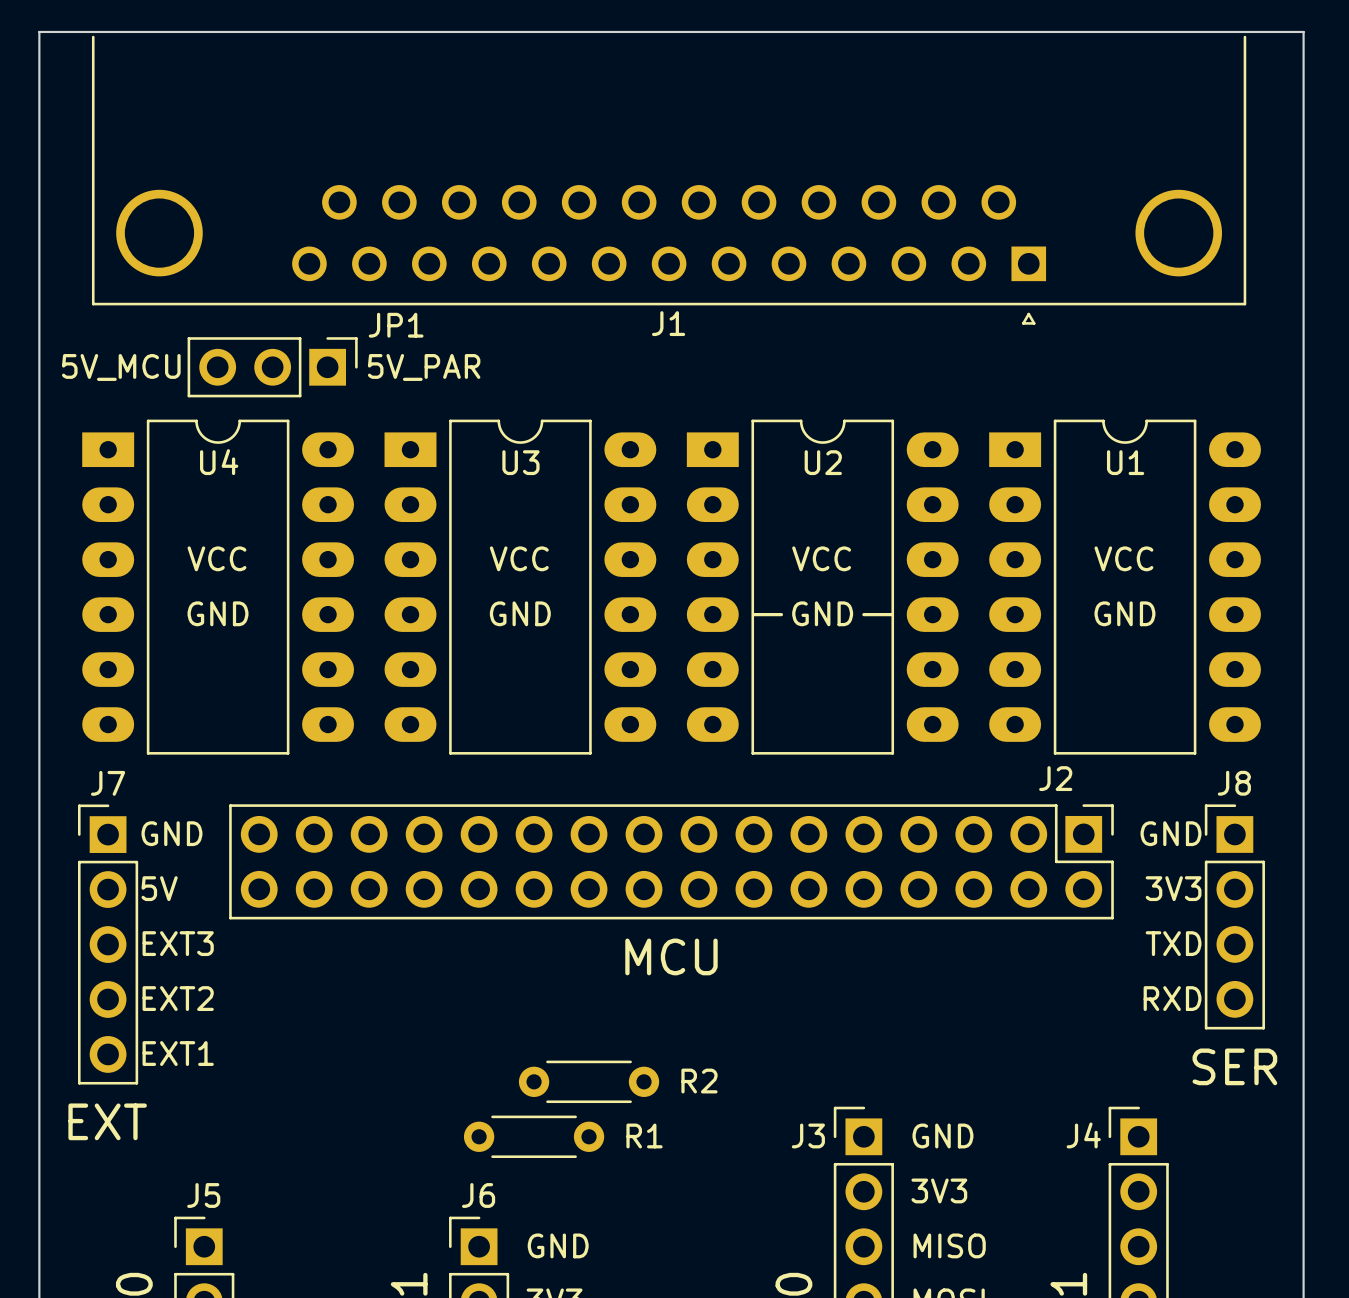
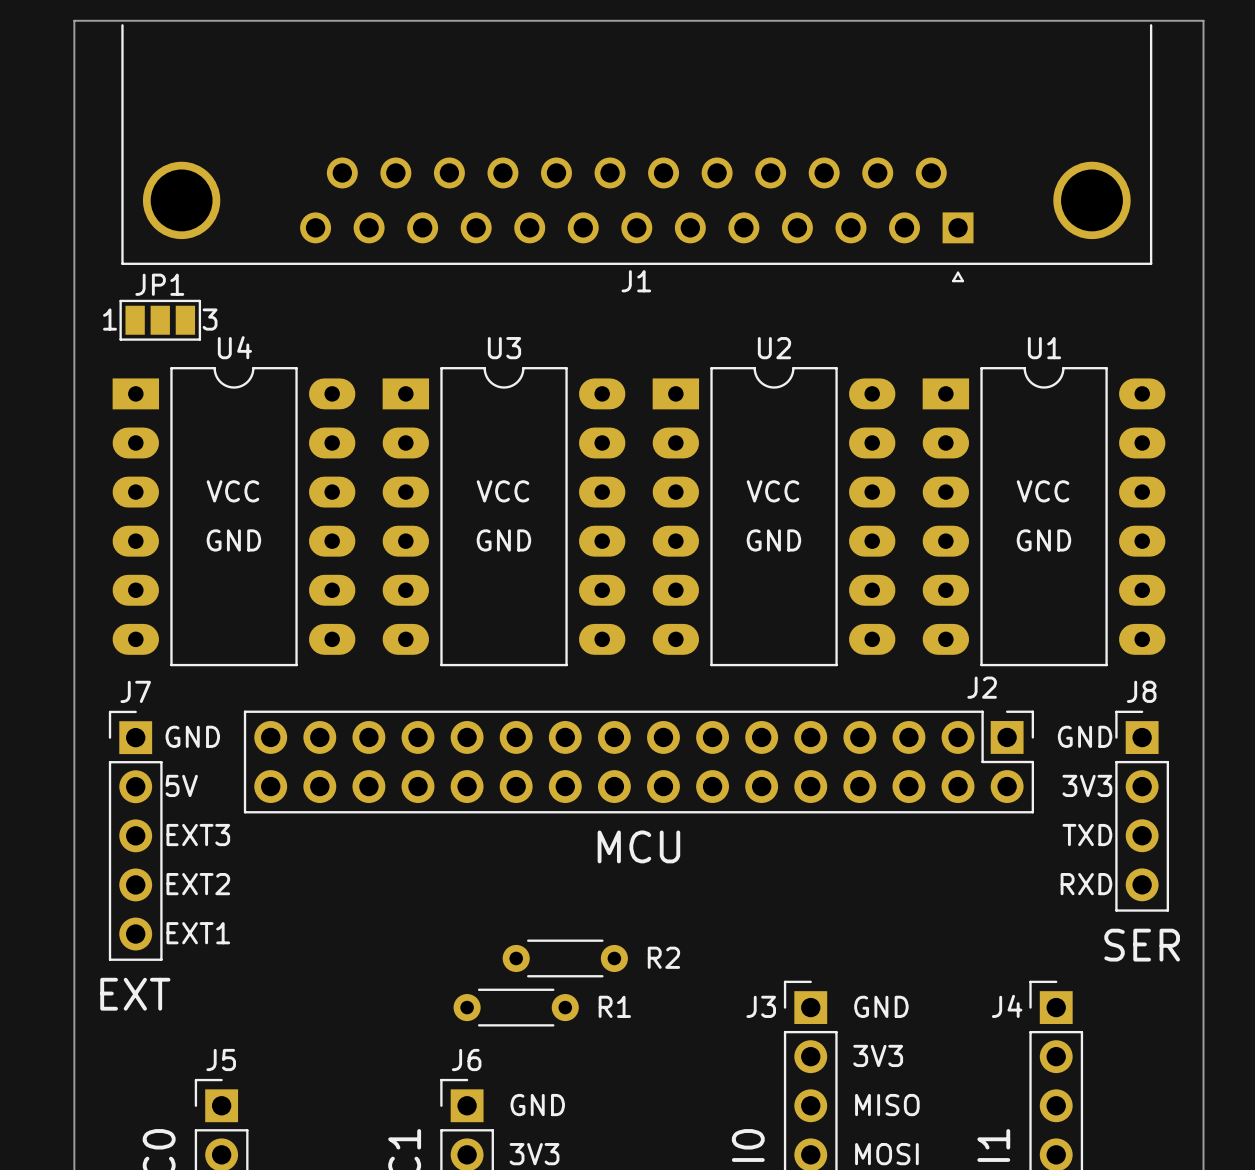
JP1 name position: JP1 (396, 325) -> JP1 (159, 284)
JP1 footprint: [187, 337, 358, 398] -> [119, 299, 202, 341]
text: 5V_MCU (121, 367) -> none
text: 5V_PAR (424, 367) -> none
U4 name position: U4 (219, 462) -> U4 (234, 347)
U3 name position: U3 (520, 462) -> U3 (504, 348)
U2 name position: U2 (823, 462) -> U2 (774, 348)
U1 name position: U1 (1125, 462) -> U1 (1044, 348)
line: (753, 614) (781, 614) -> none
line: (863, 614) (891, 614) -> none

